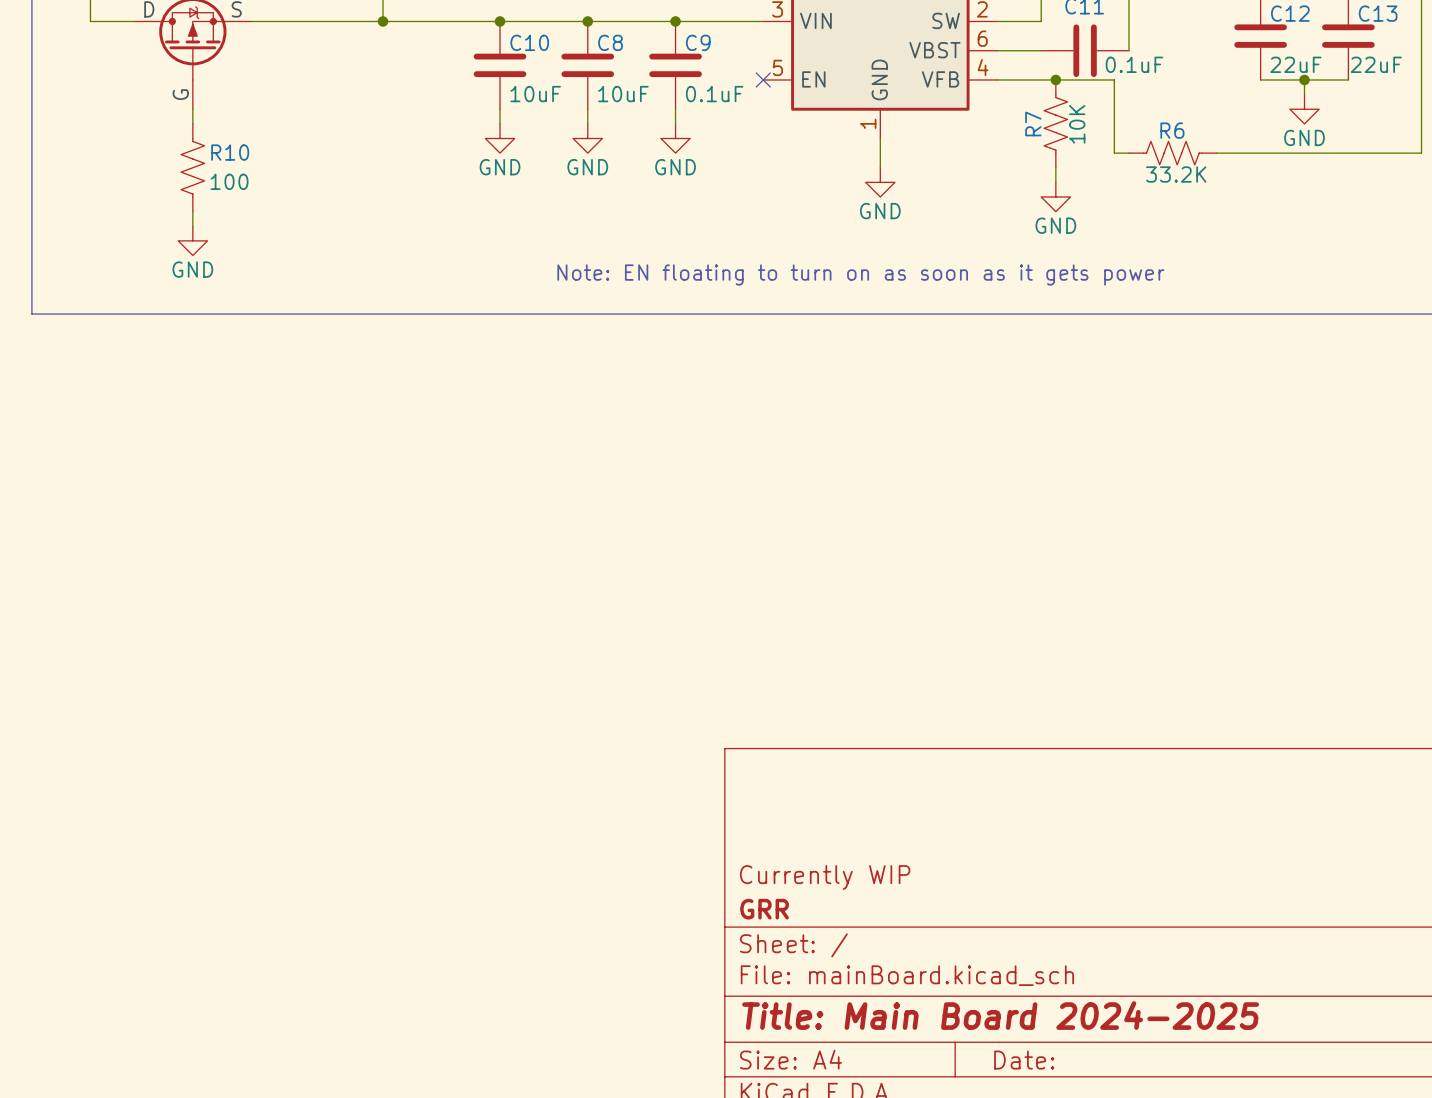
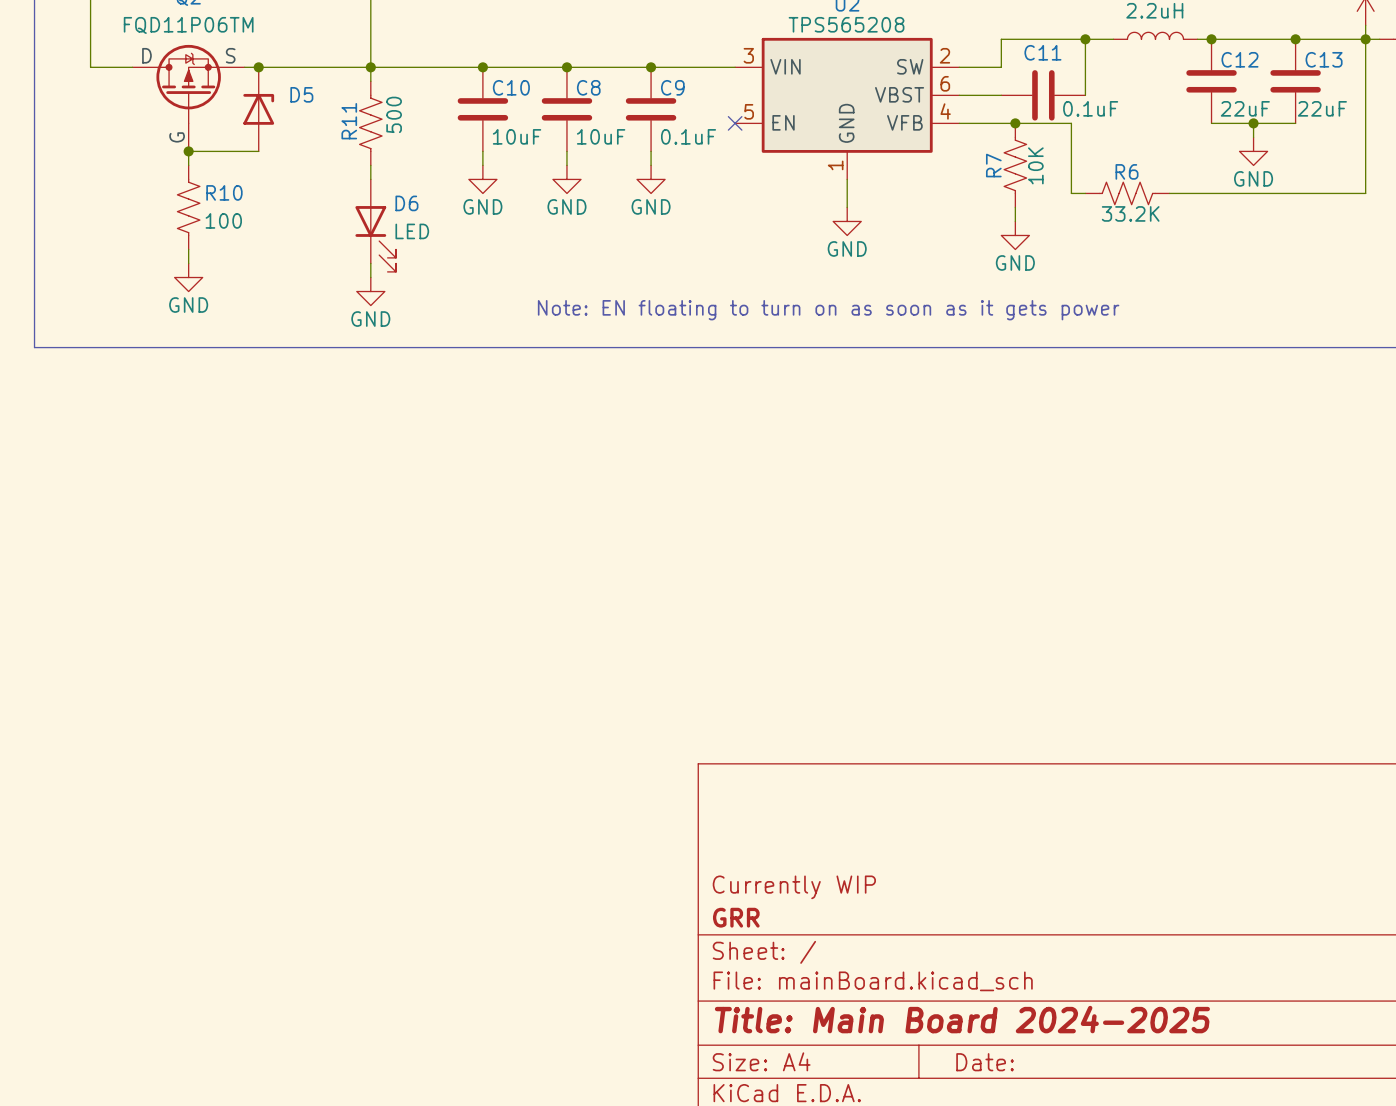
junction: none -> (258, 67)
wire: none -> (370, 67) (370, 81)
D5: none -> (258, 109)
R11: none -> 500 (370, 123)
wire: none -> (188, 151) (258, 151)
junction: none -> (188, 151)
wire: none -> (370, 165) (370, 179)
D6: none -> LED (375, 225)
wire: none -> (370, 263) (370, 277)
power symbol: none -> GND (370, 291)

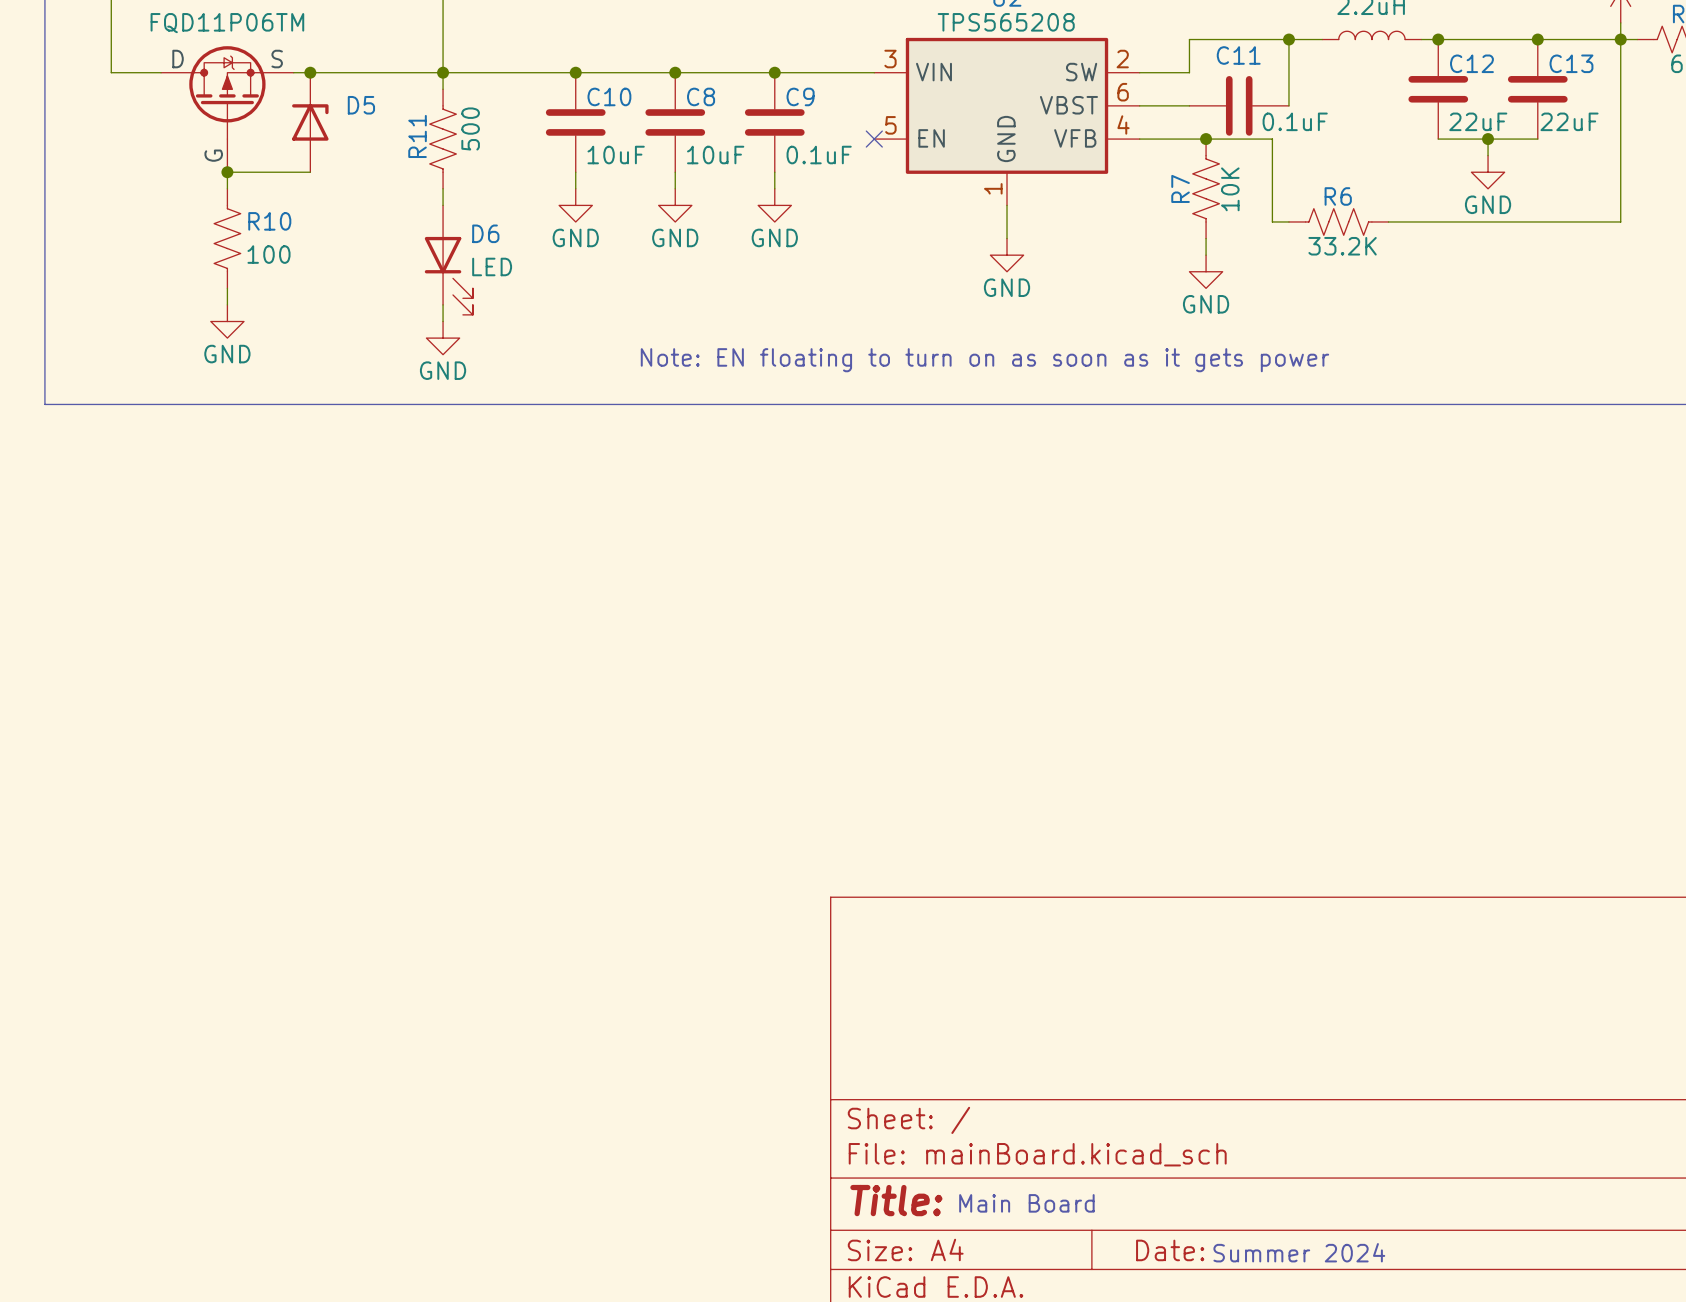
title block: Currently WIP (794, 887) -> none
title block: GRR (736, 917) -> none
title block: Title: Main Board 2024-2025 (962, 1019) -> Title: (896, 1200)
text: none -> Main Board (1026, 1203)
text: none -> Summer 2024 (1299, 1252)

